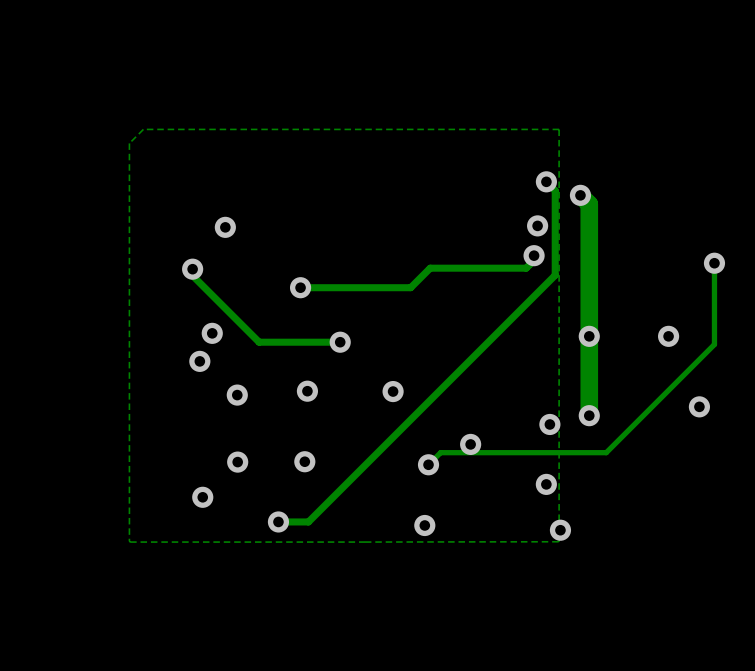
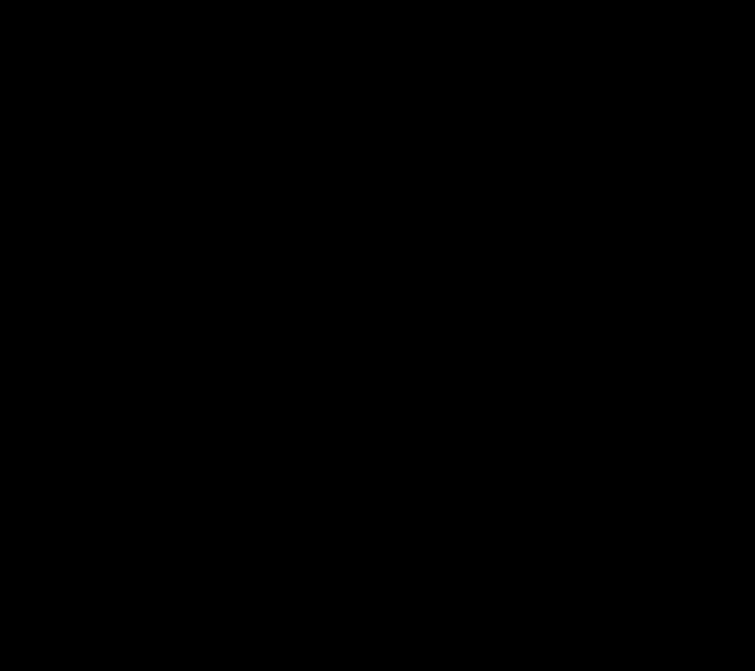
zone outline: (559, 129) (143, 129) (129, 143) (129, 541) (559, 541) (559, 129) -> none
track: (546, 181) (555, 190) (555, 275) (308, 521) (278, 521) -> none
via: (546, 181) -> none
track: (580, 195) (589, 204) (589, 415) -> none
via: (580, 195) -> none
via: (537, 225) -> none
via: (225, 227) -> none
track: (534, 255) (526, 268) (430, 268) (410, 287) (300, 287) -> none
via: (534, 255) -> none
track: (714, 263) (714, 344) (606, 452) (440, 452) (428, 464) -> none
via: (714, 263) -> none
track: (192, 269) (192, 275) (259, 342) (340, 342) -> none
via: (192, 269) -> none
via: (300, 287) -> none
via: (212, 333) -> none
via: (589, 336) -> none
via: (668, 336) -> none
via: (340, 342) -> none
via: (199, 361) -> none
via: (307, 391) -> none
via: (393, 391) -> none
via: (237, 395) -> none
via: (699, 406) -> none
via: (589, 415) -> none
via: (549, 424) -> none
via: (470, 444) -> none
via: (304, 461) -> none
via: (237, 462) -> none
via: (428, 464) -> none
via: (546, 484) -> none
via: (202, 497) -> none
via: (278, 521) -> none
via: (424, 525) -> none
via: (560, 530) -> none

